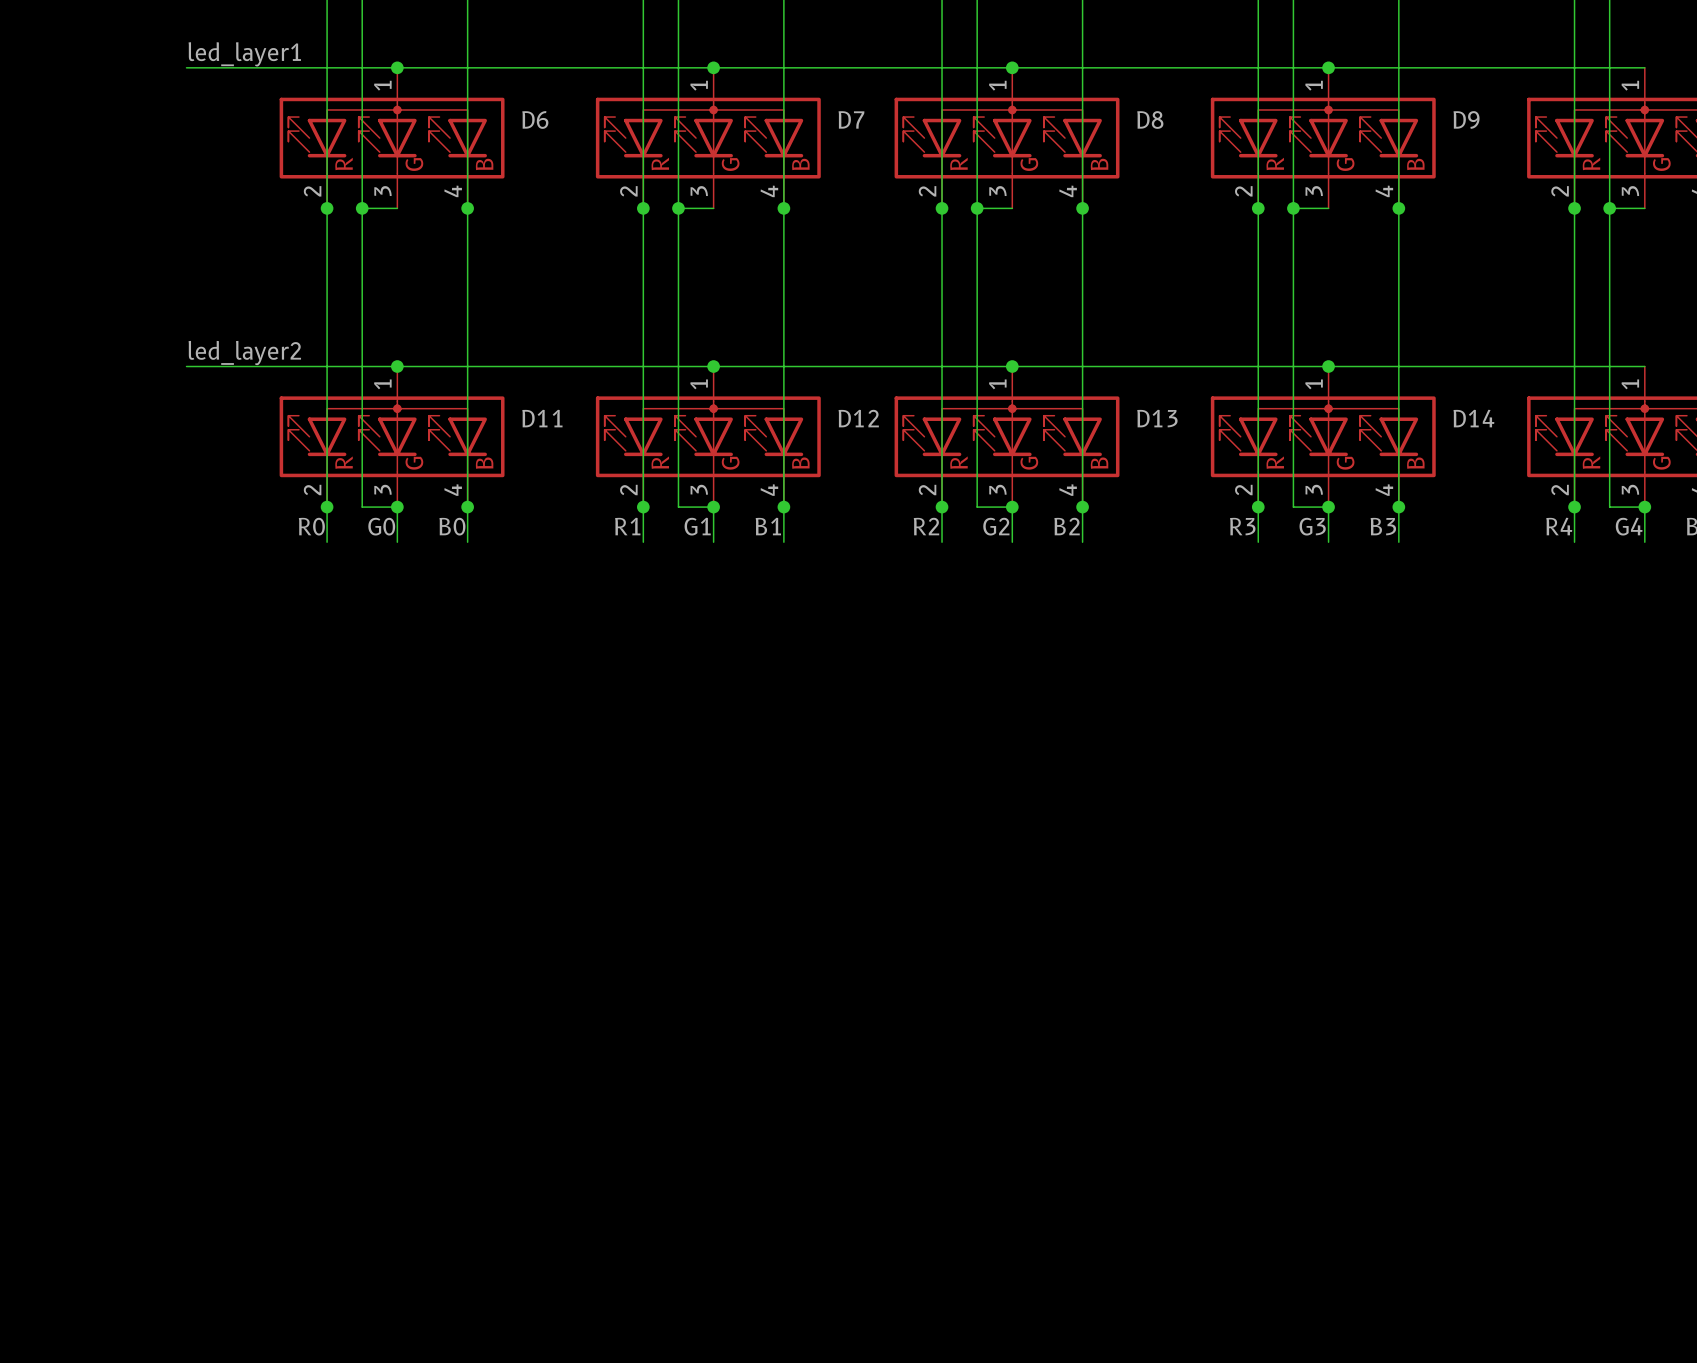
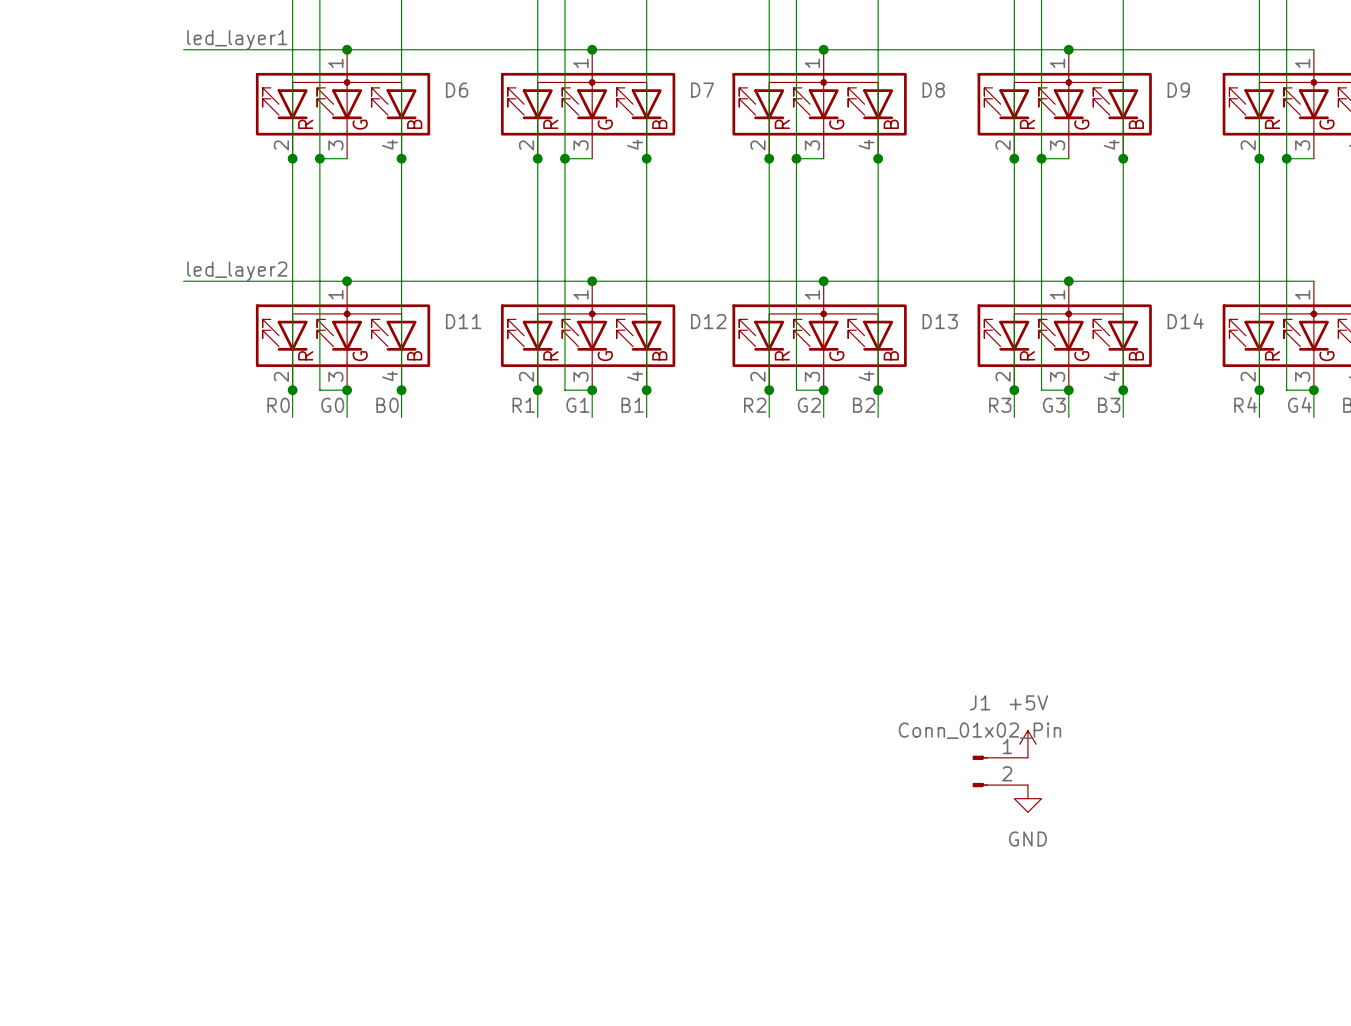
power symbol: none -> +5V (1027, 744)
J1: none -> Conn_01x02_Pin (1000, 771)
power symbol: none -> GND (1027, 798)

